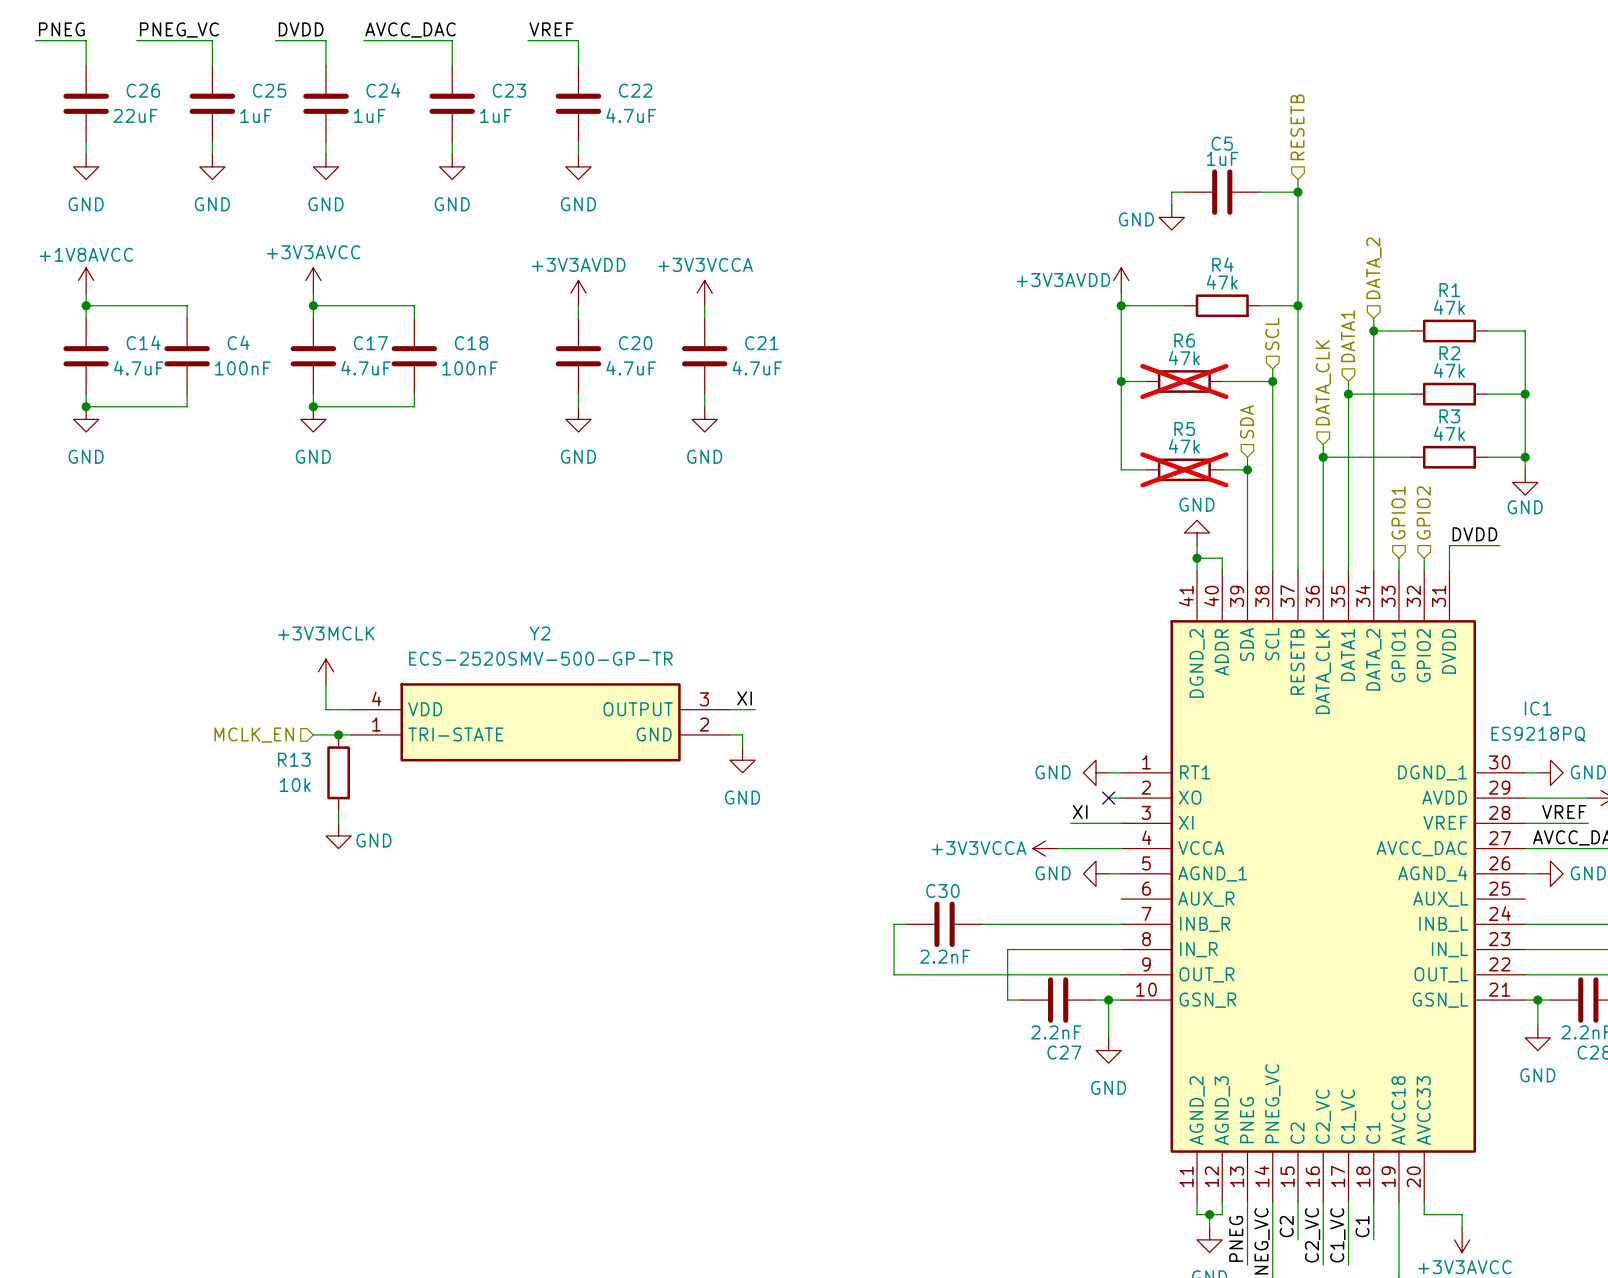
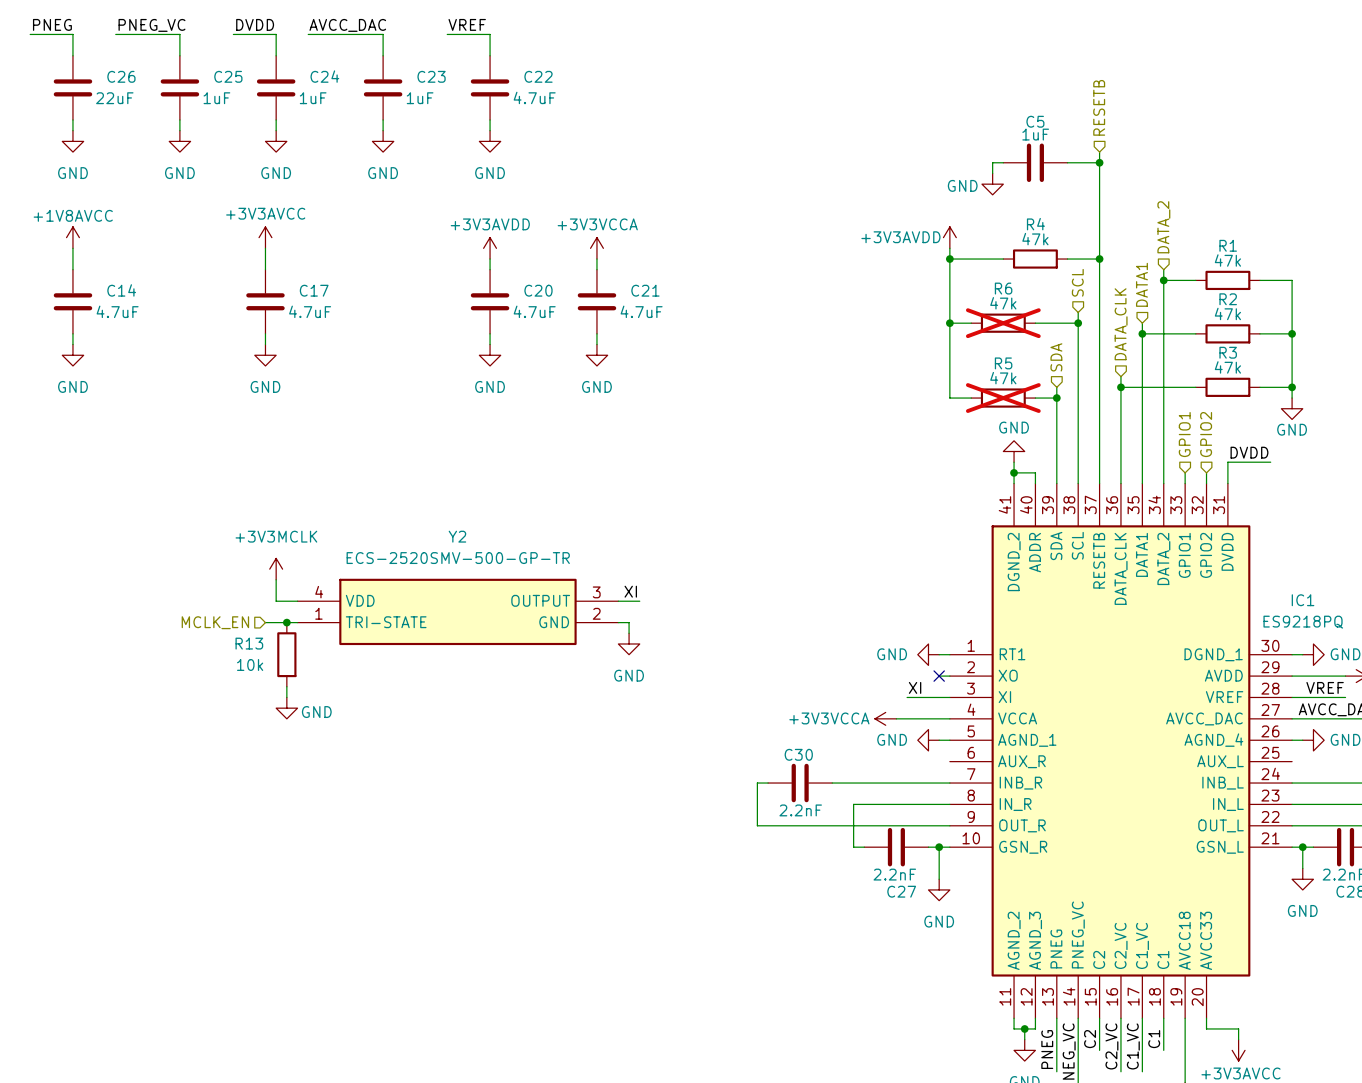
wire: (86, 305) (187, 305) (187, 318) -> none
junction: (86, 305) -> none
wire: (313, 305) (414, 305) (414, 318) -> none
junction: (313, 305) -> none
C4: 100nF (187, 356) -> none
C18: 100nF (414, 356) -> none
wire: (187, 394) (187, 406) (86, 406) -> none
wire: (414, 394) (414, 406) (313, 406) -> none
junction: (86, 406) -> none
junction: (313, 406) -> none

